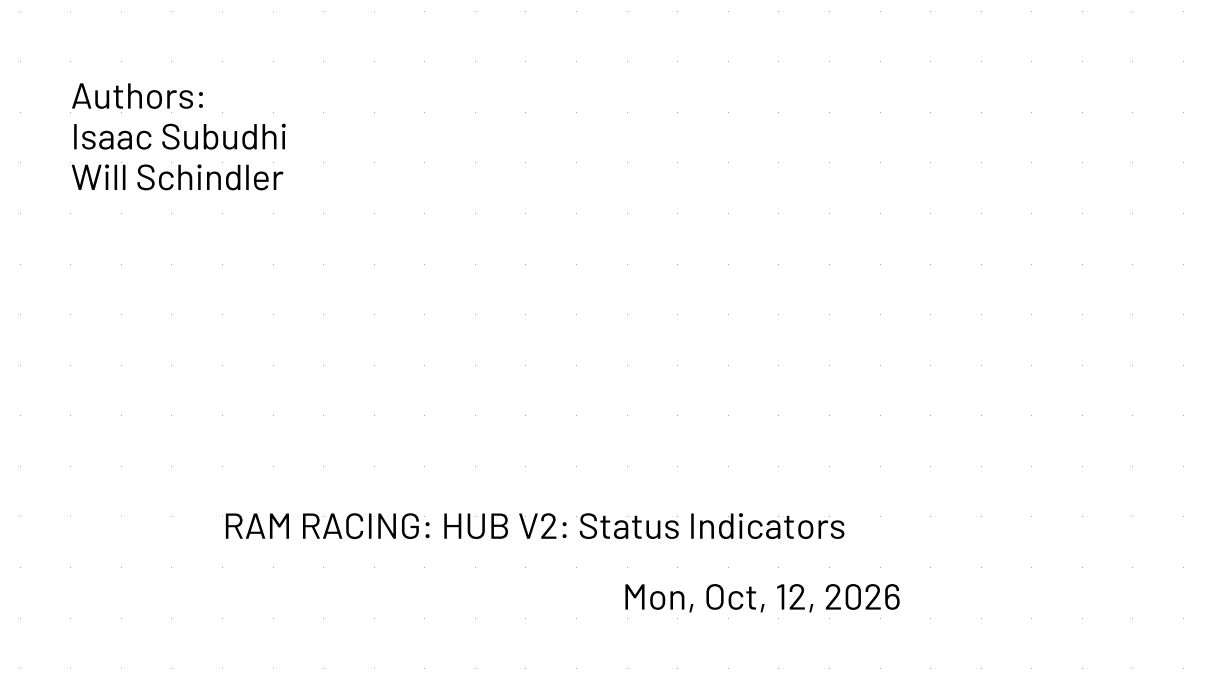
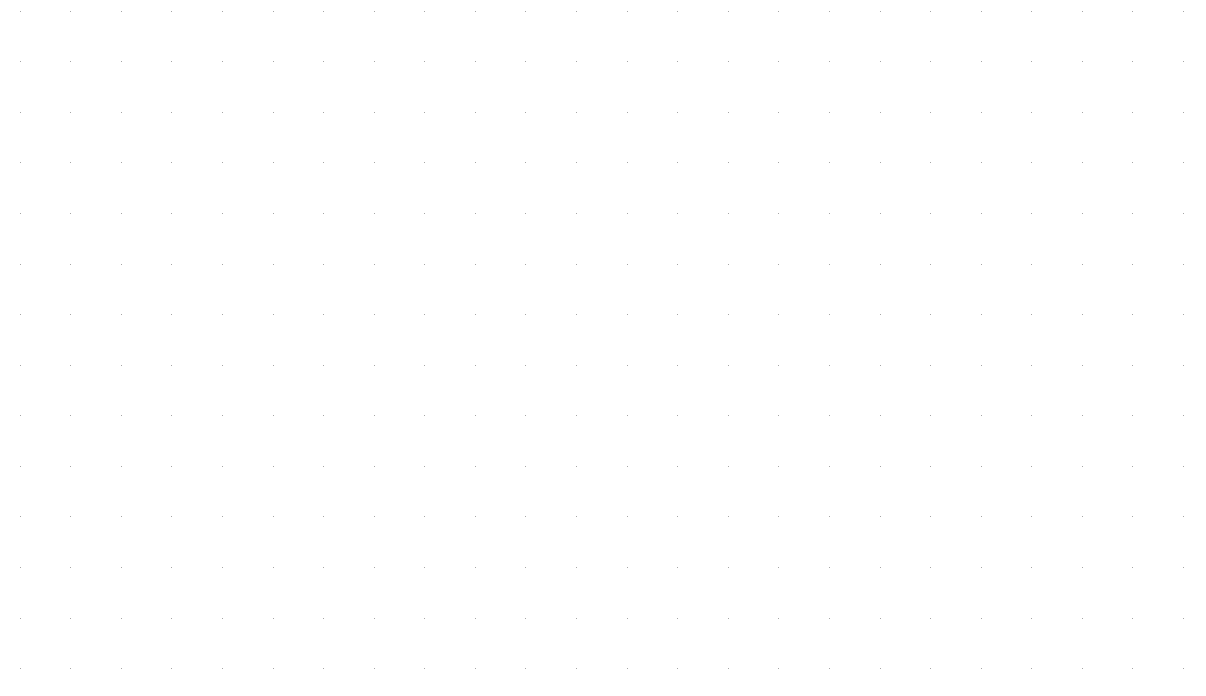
text: Authors: (137, 96) -> none
text: Isaac Subudhi (179, 136) -> none
text: Will Schindler (177, 177) -> none
text: RAM RACING: HUB V2: Status Indicators (535, 526) -> none
text: Mon, Oct, 12, 2026 (762, 598) -> none

